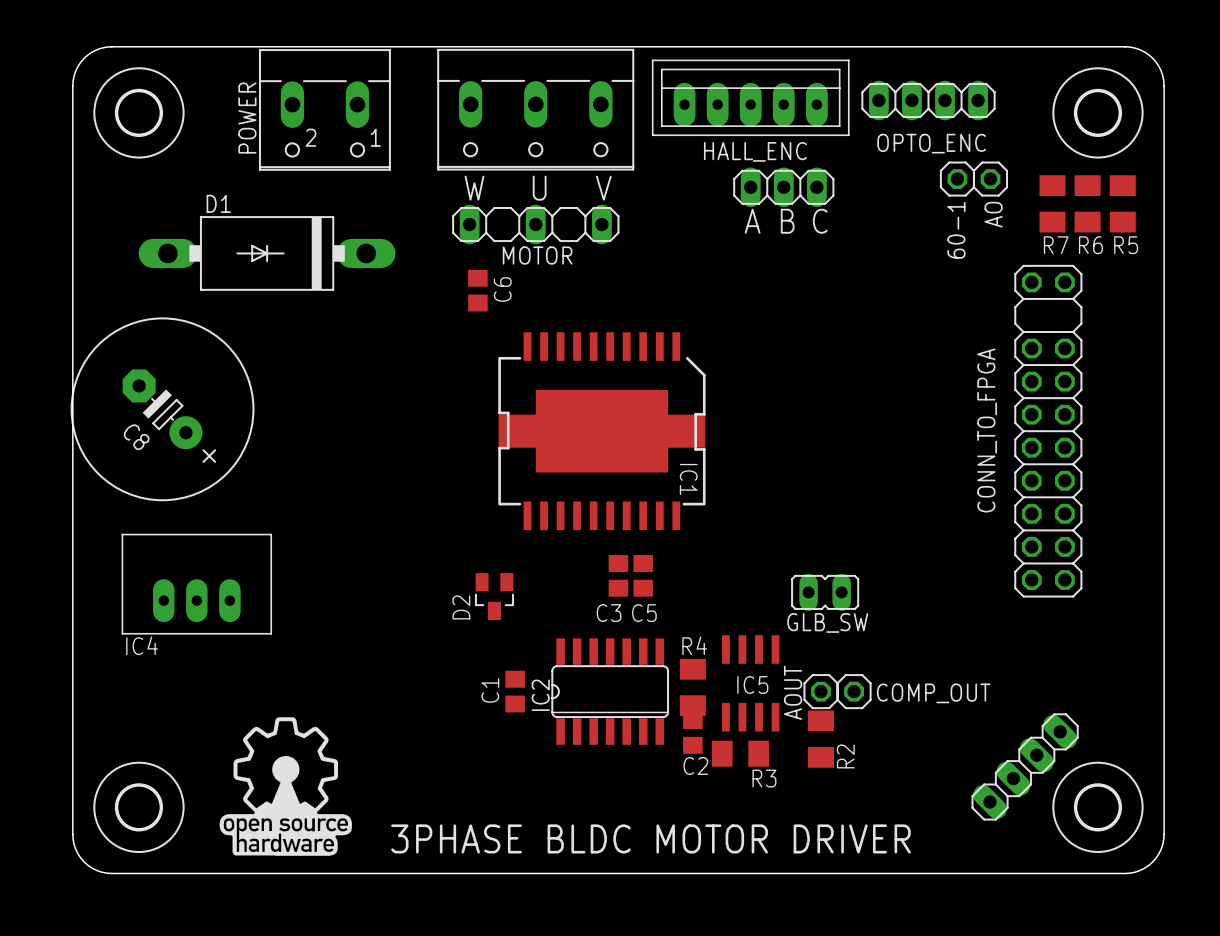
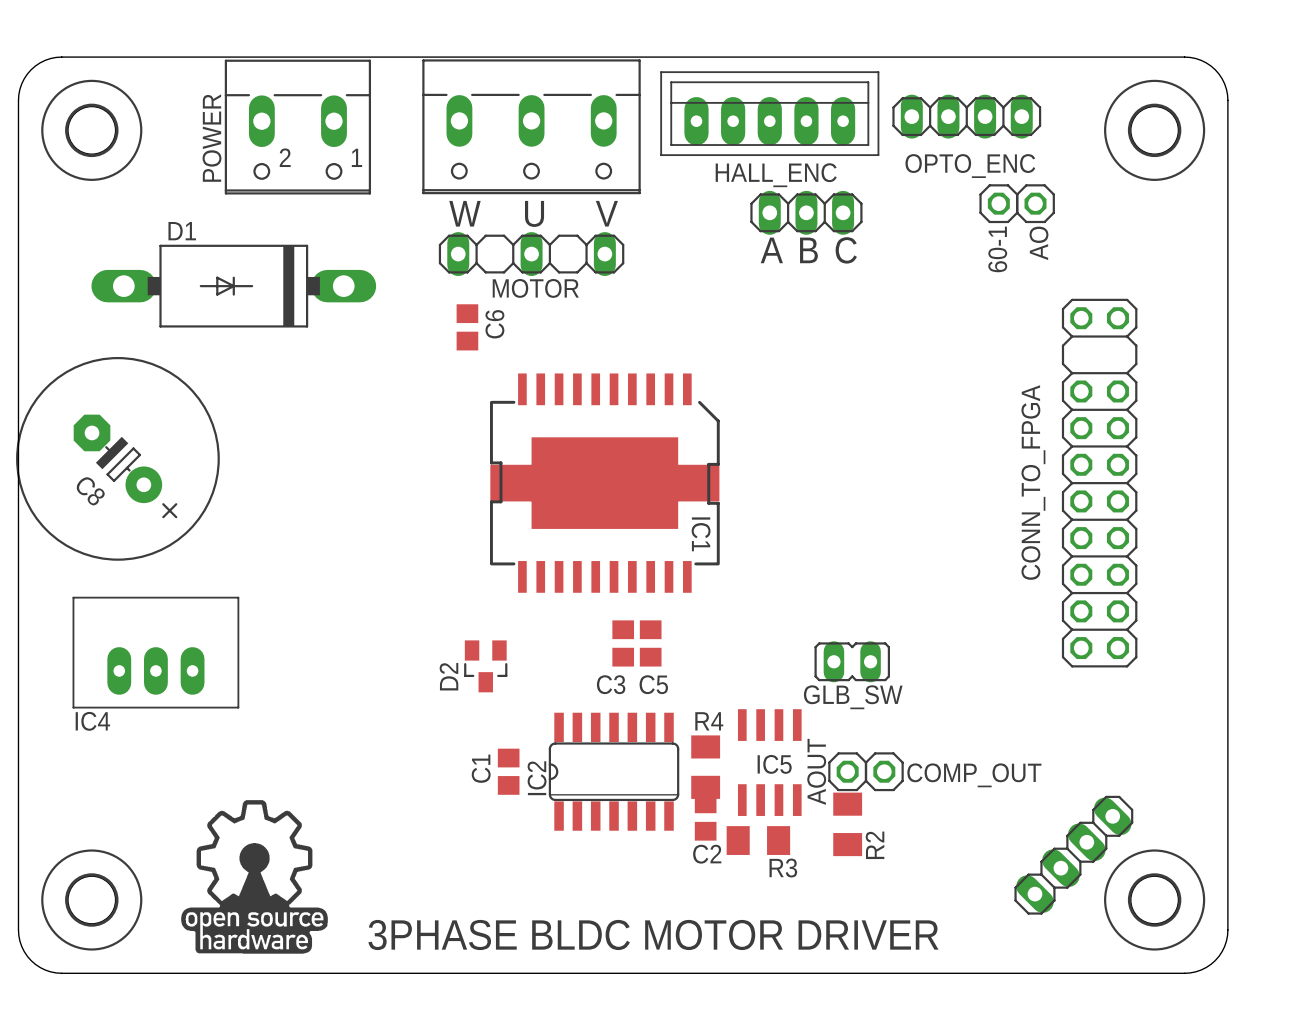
R7: (1052, 203) -> none
R6: (1087, 203) -> none
R5: (1122, 203) -> none

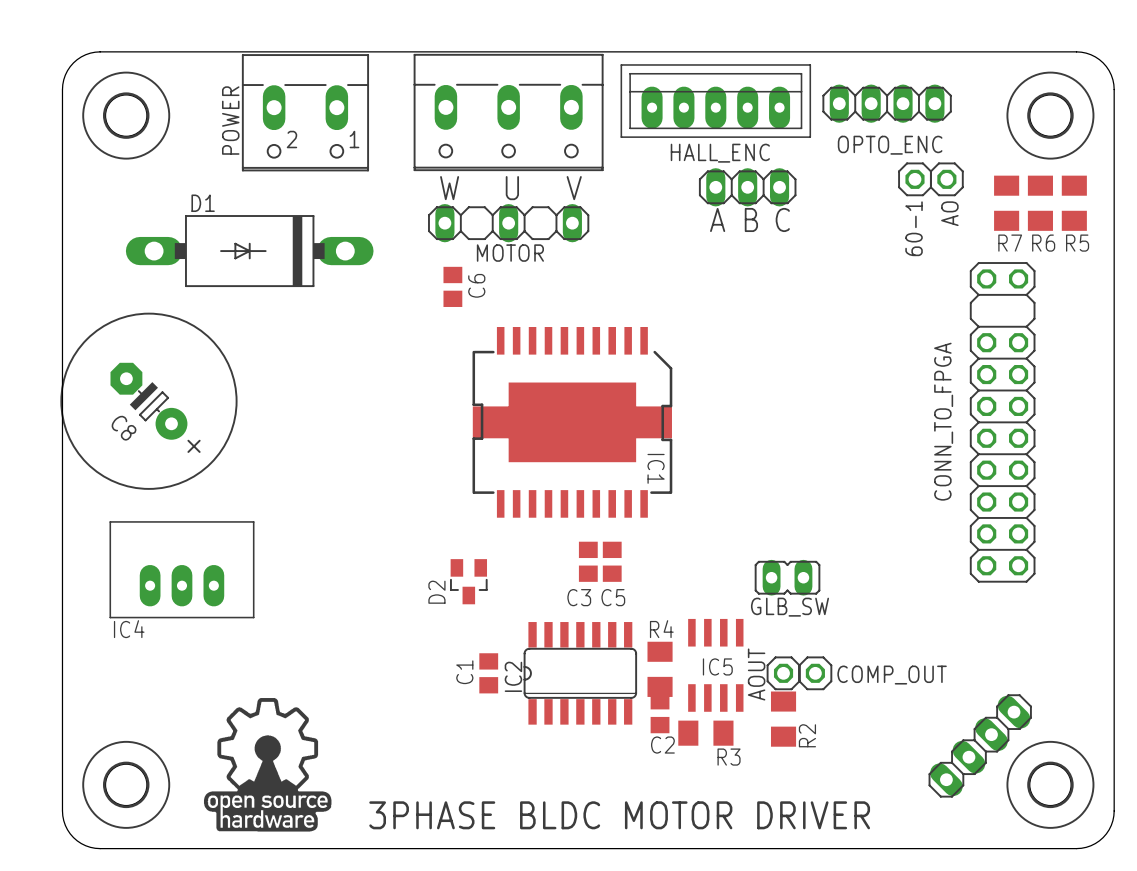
R7: none -> (1006, 203)
R6: none -> (1040, 203)
R5: none -> (1074, 203)

